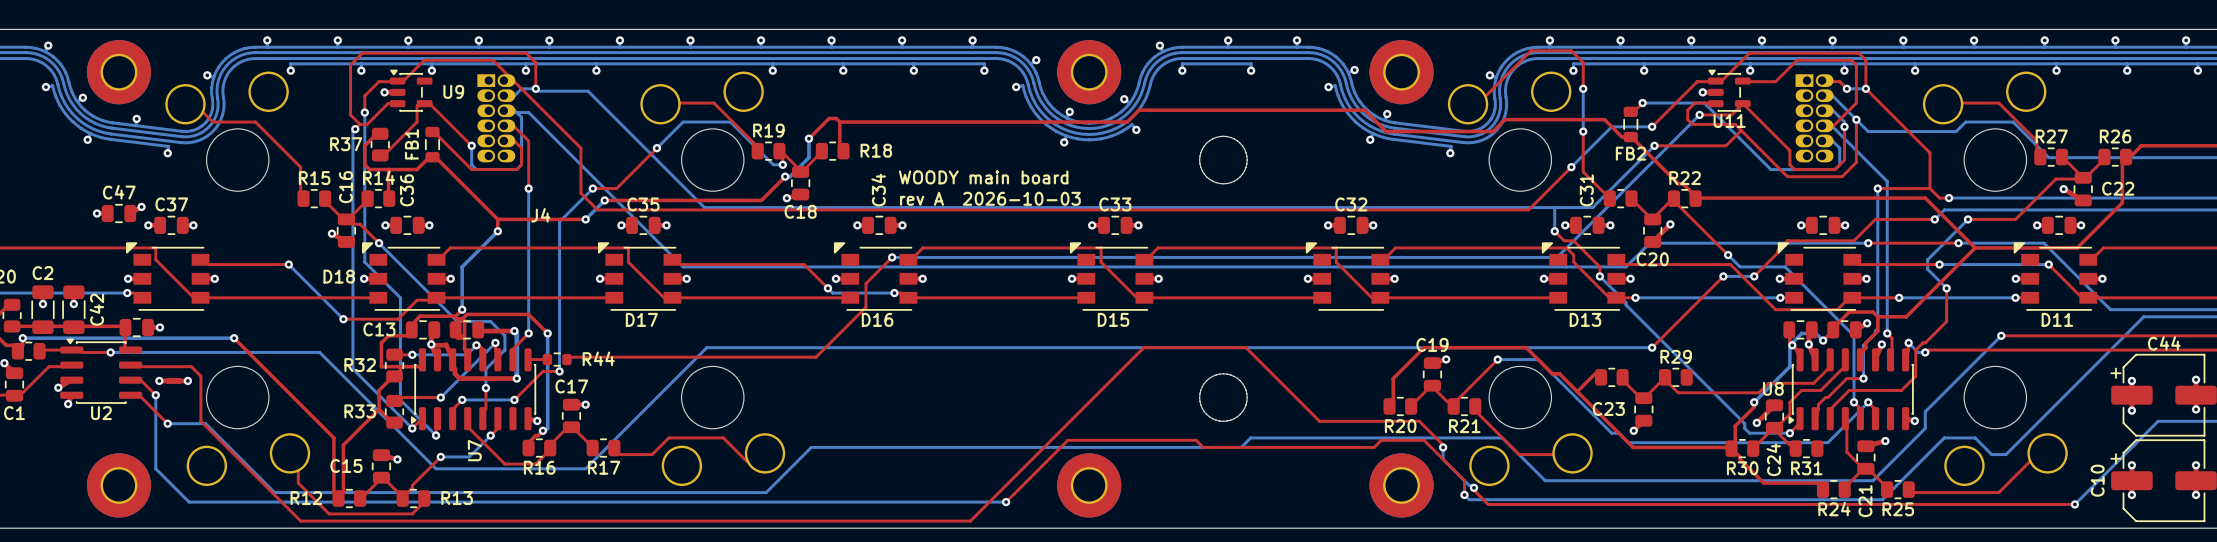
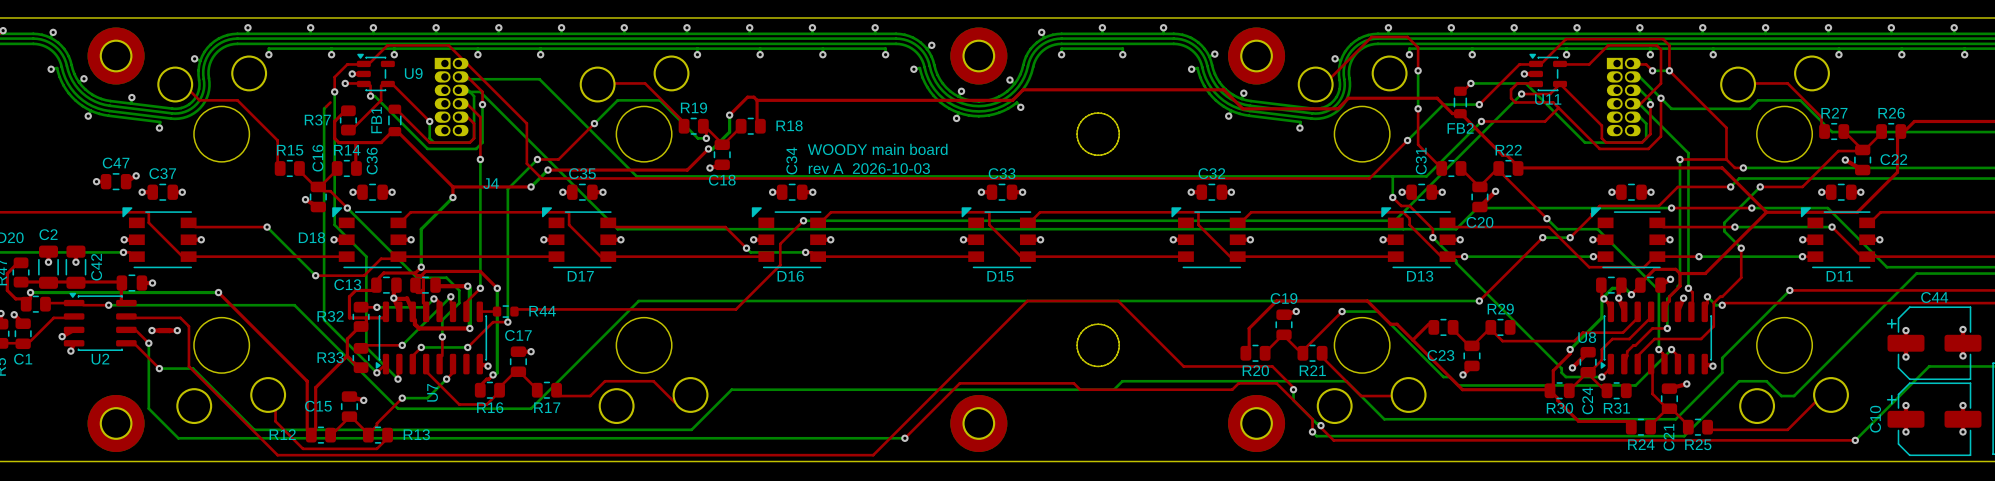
top track: (535, 88) (535, 62) (526, 53) (362, 53) (350, 65) (350, 114) (360, 124) (367, 124) (387, 103) (397, 103) -> none
bottom track: (535, 88) (521, 88) (514, 95) (503, 95) -> none
via position: (535, 88) -> (482, 104)
bottom track: (538, 91) (588, 91) (595, 98) -> (467, 79) (539, 79)
top track: none -> (467, 77) (482, 91) (482, 104)
top track: none -> (345, 83) (357, 83)
via: none -> (345, 83)
top track: none -> (370, 85) (370, 96)
bottom track: none -> (370, 96) (374, 96) (427, 148) (476, 148) (482, 142) (482, 104)
via: none -> (370, 96)
via: (355, 129) -> none

